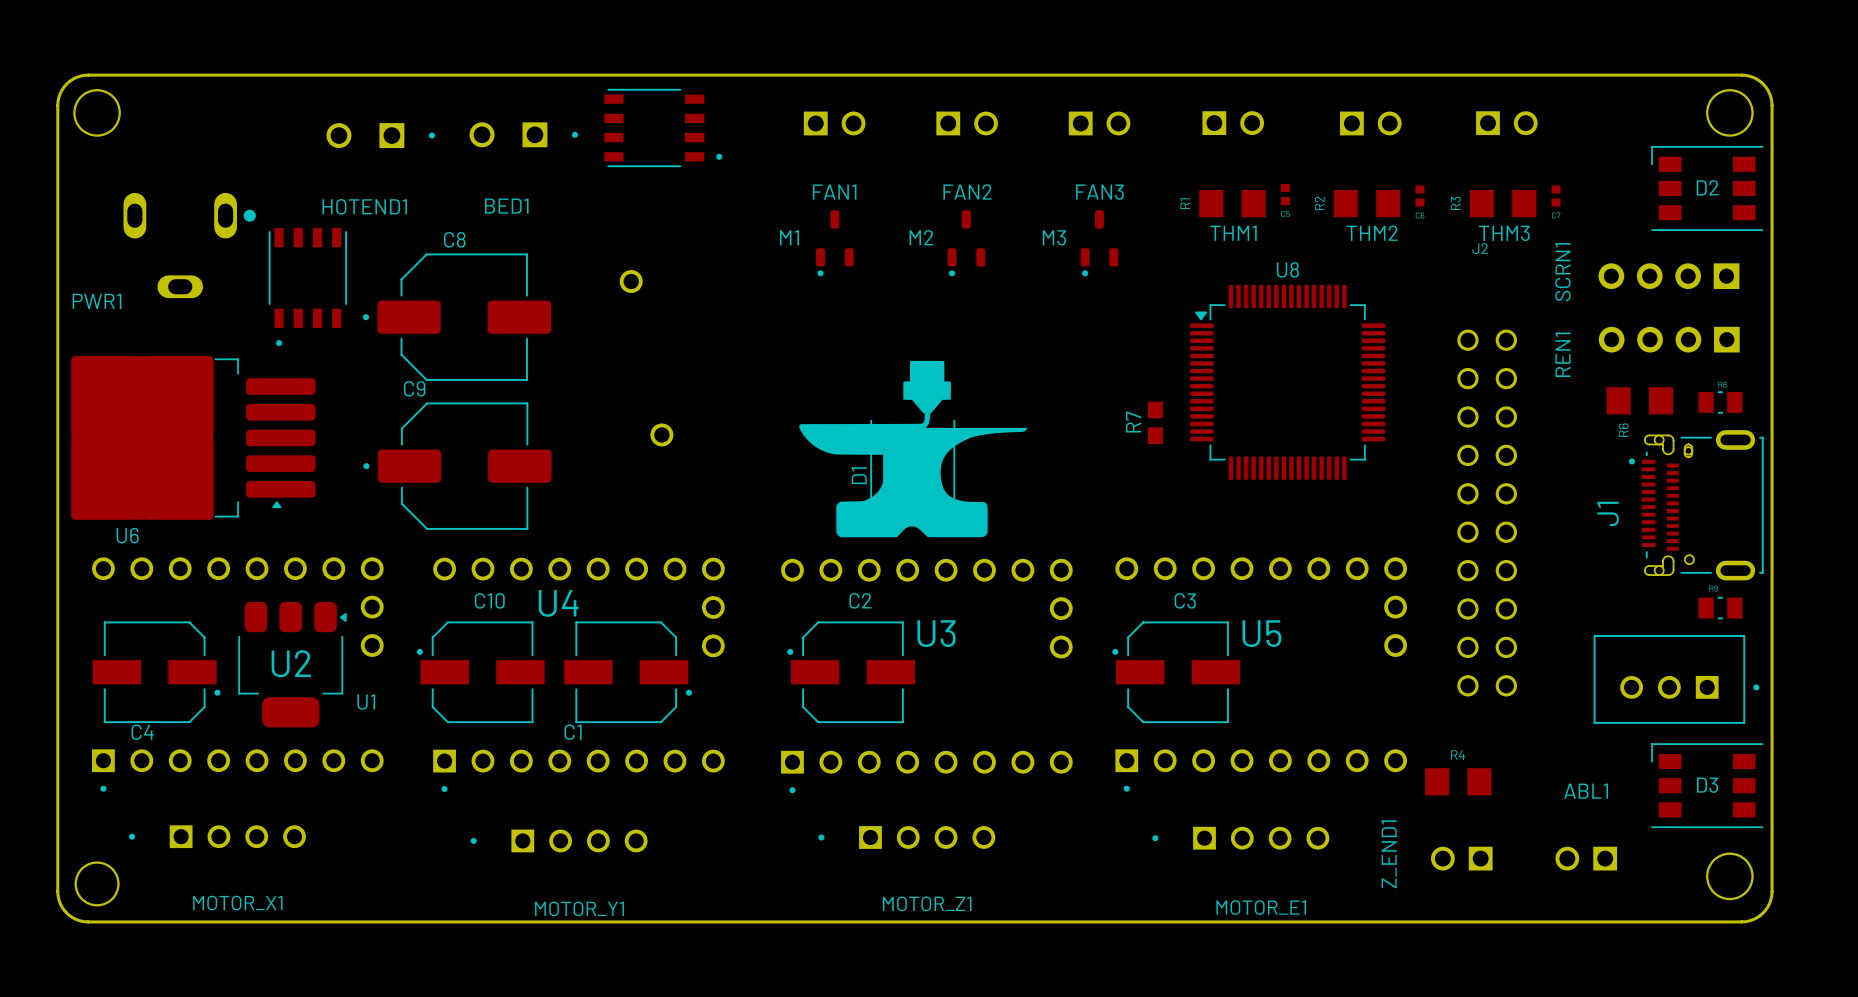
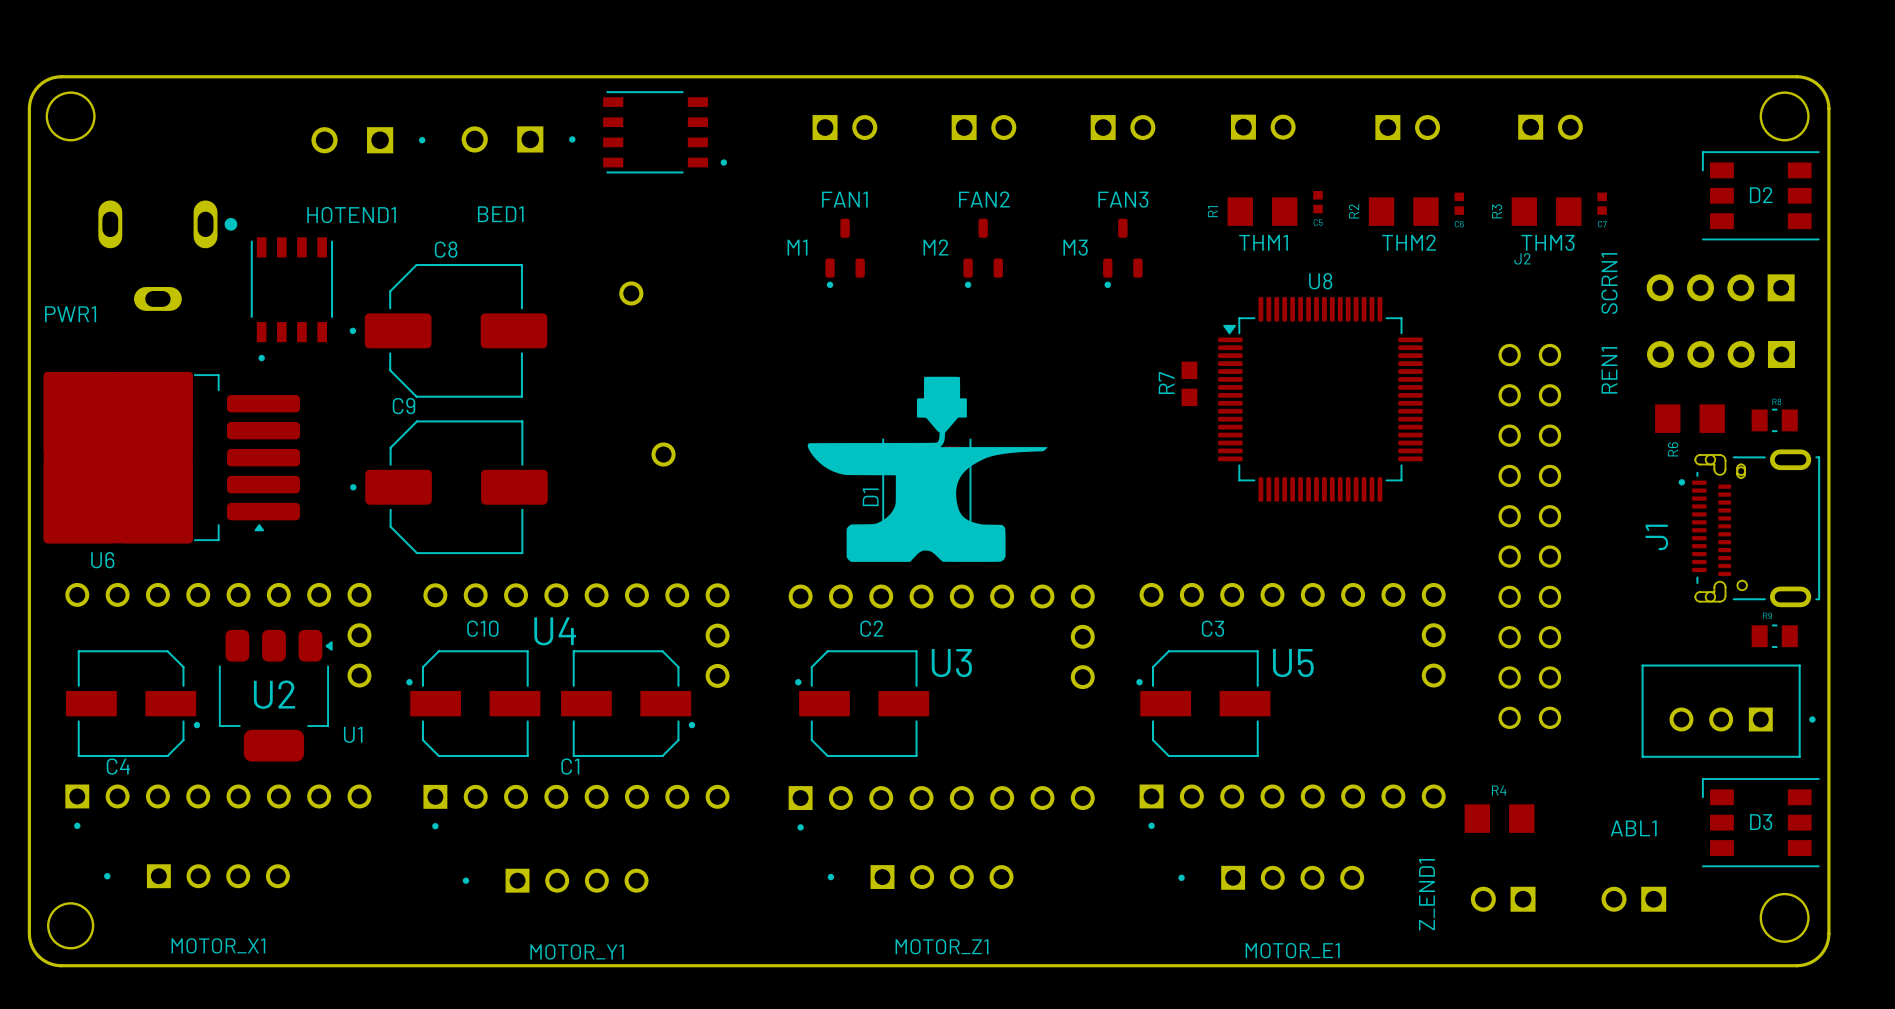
R7 position: (1155, 422) -> (1189, 383)

